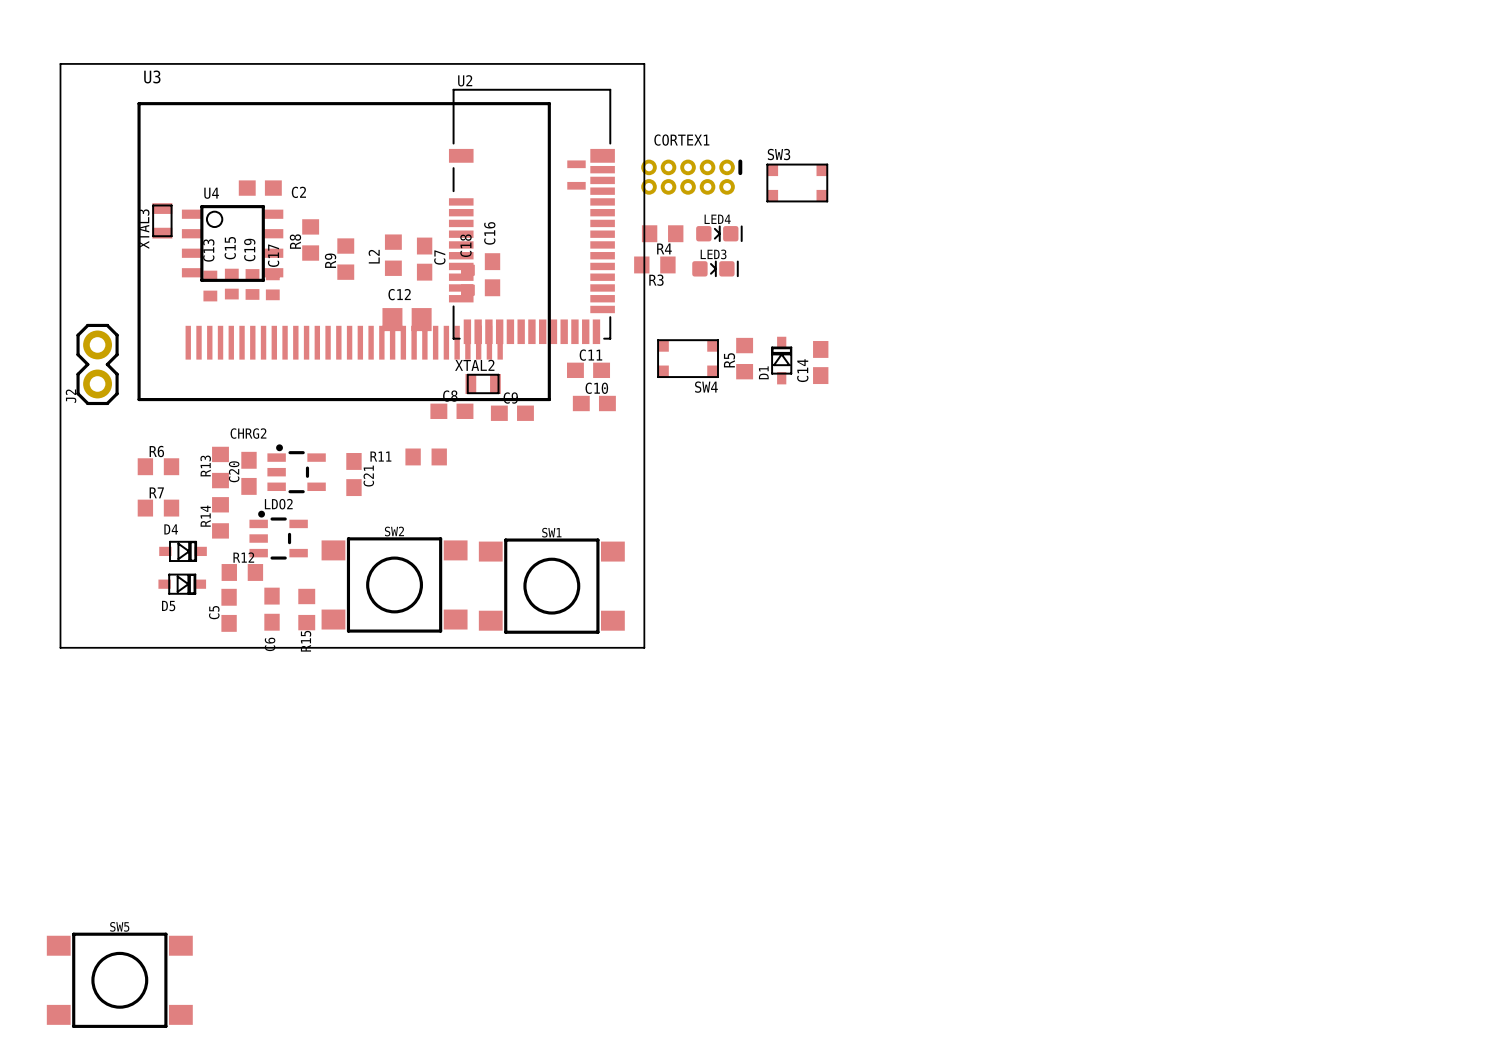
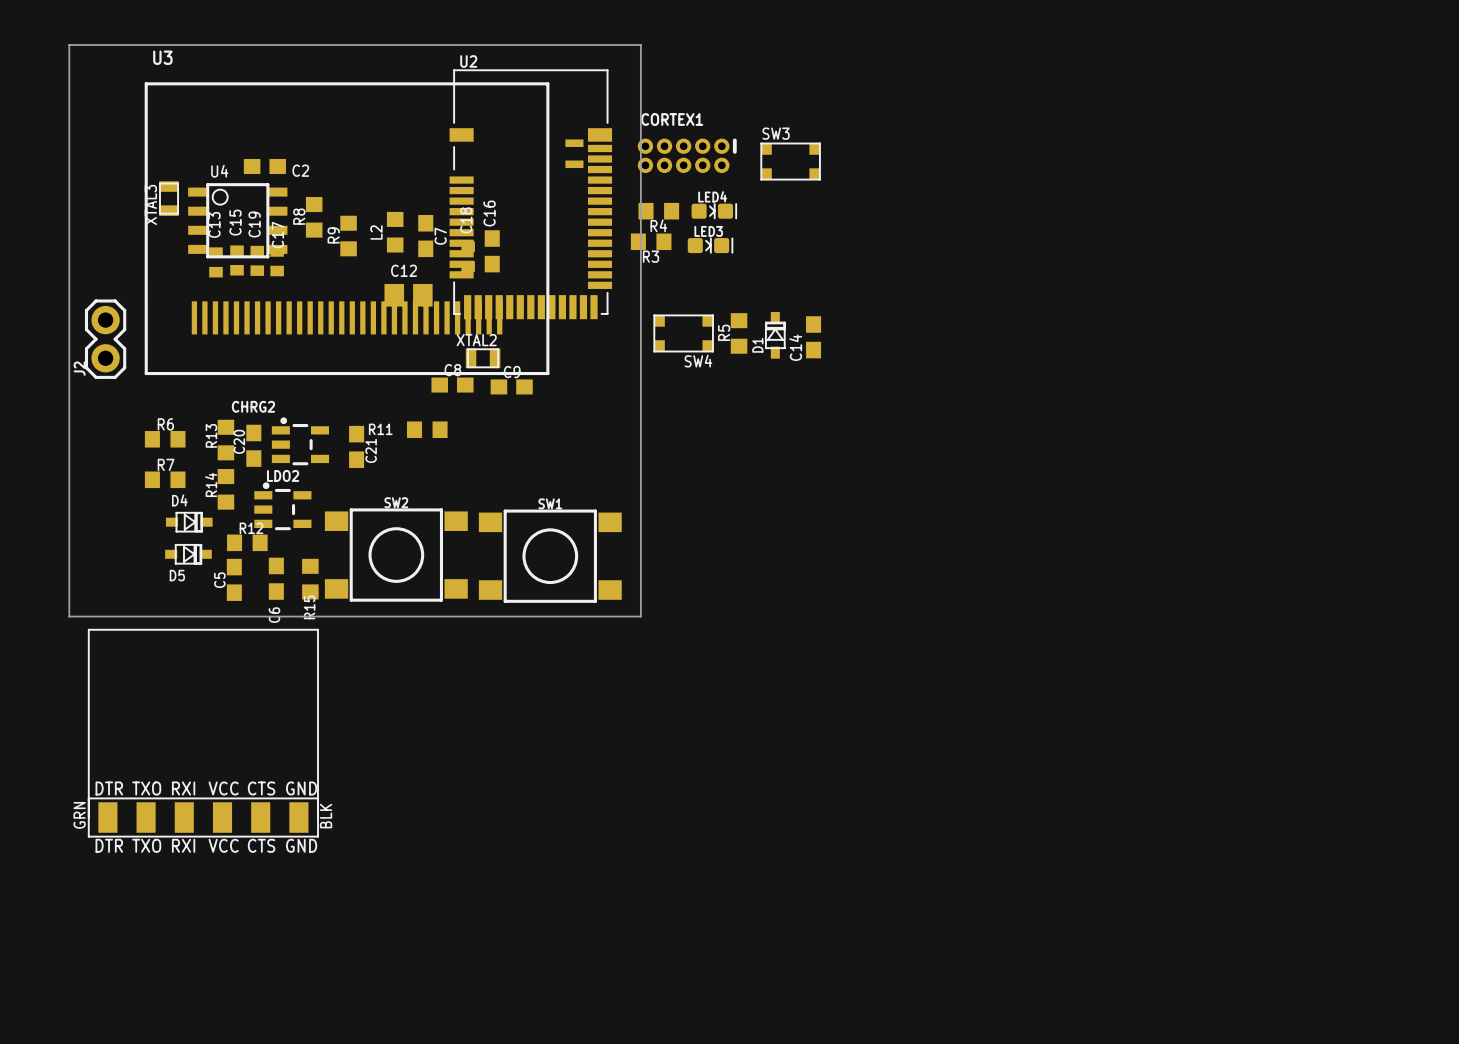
C11: (588, 370) -> none
C10: (594, 403) -> none
part: none -> (203, 733)
SW5: (119, 980) -> none

